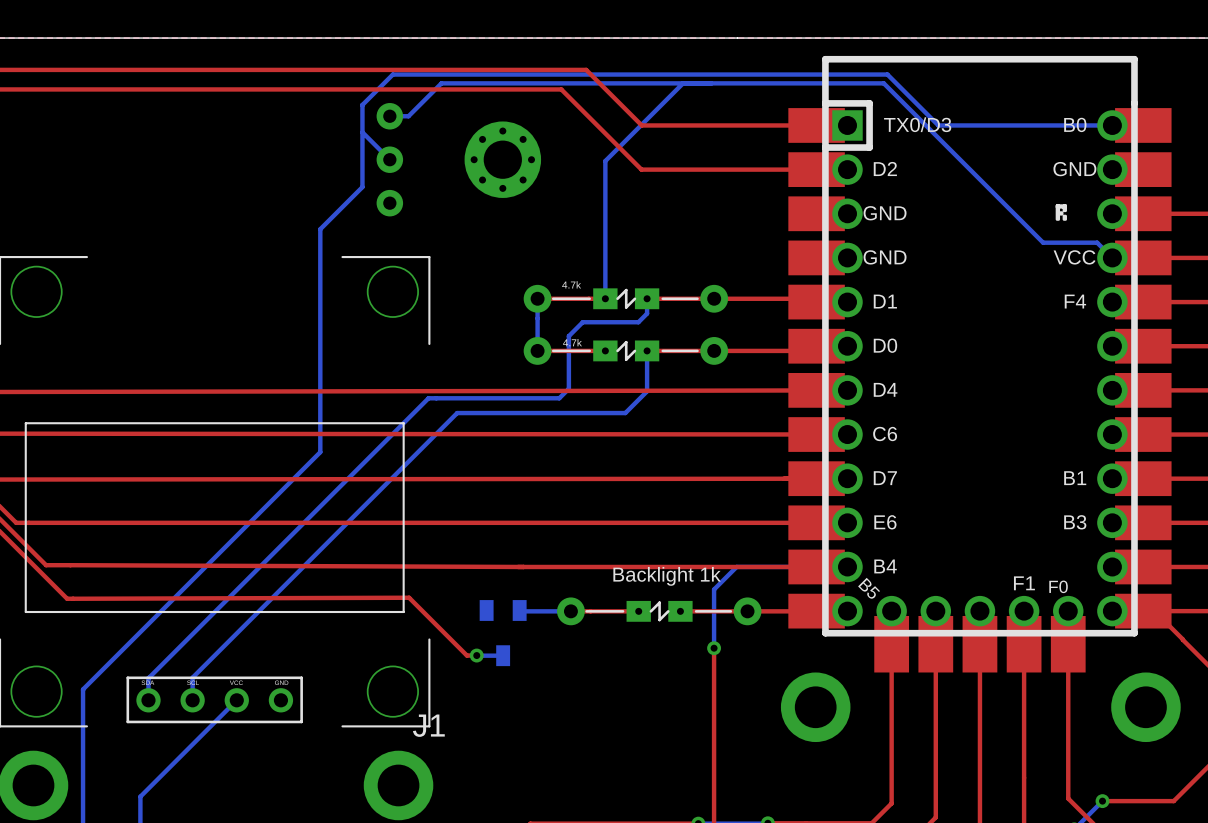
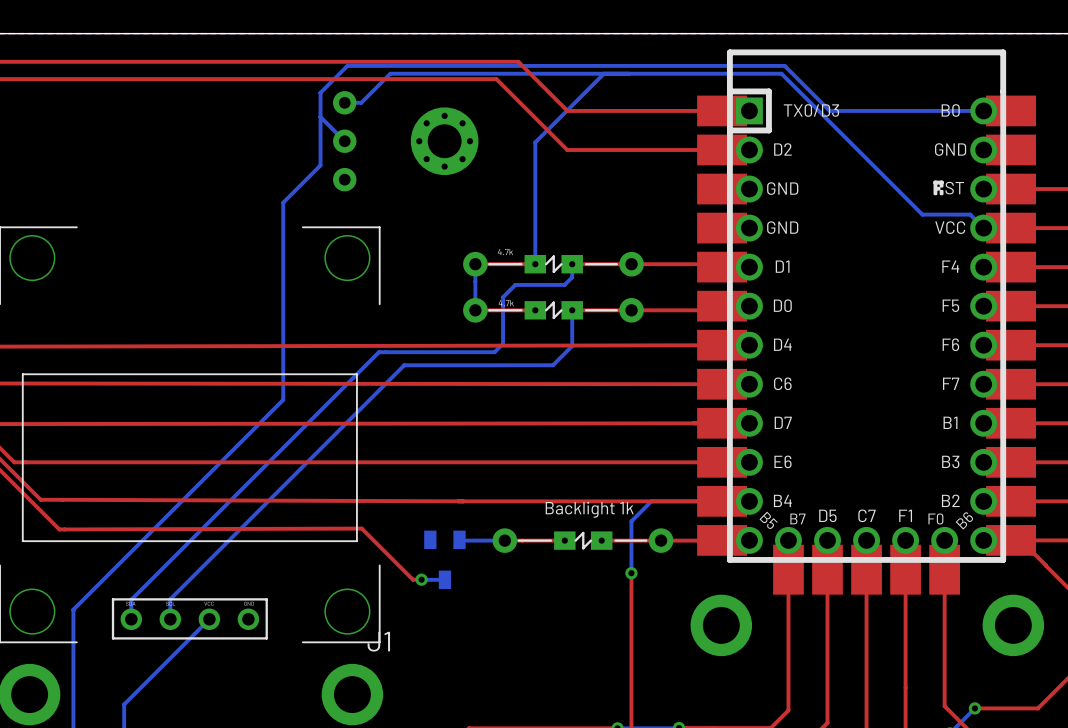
part footprint: [788, 55, 1172, 673] -> [697, 49, 1036, 595]

